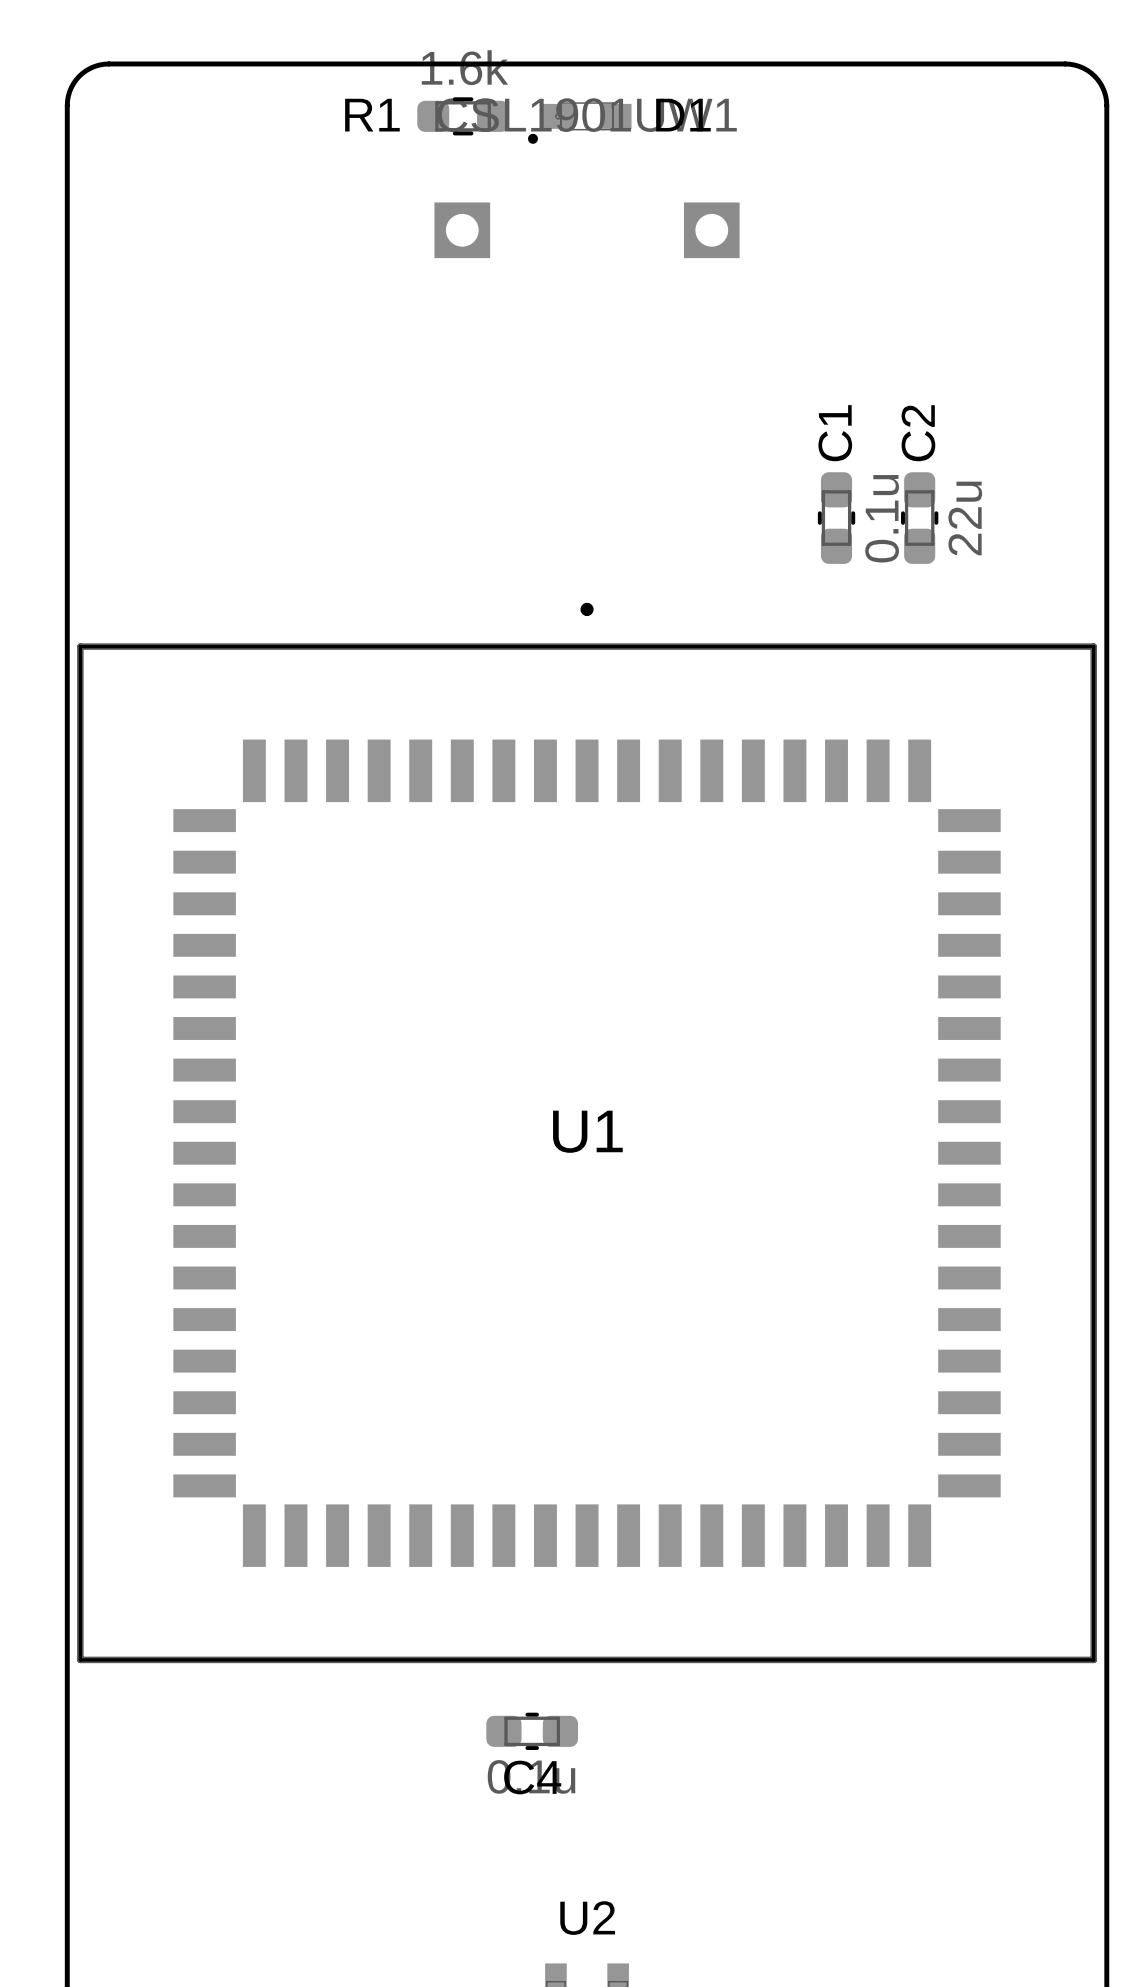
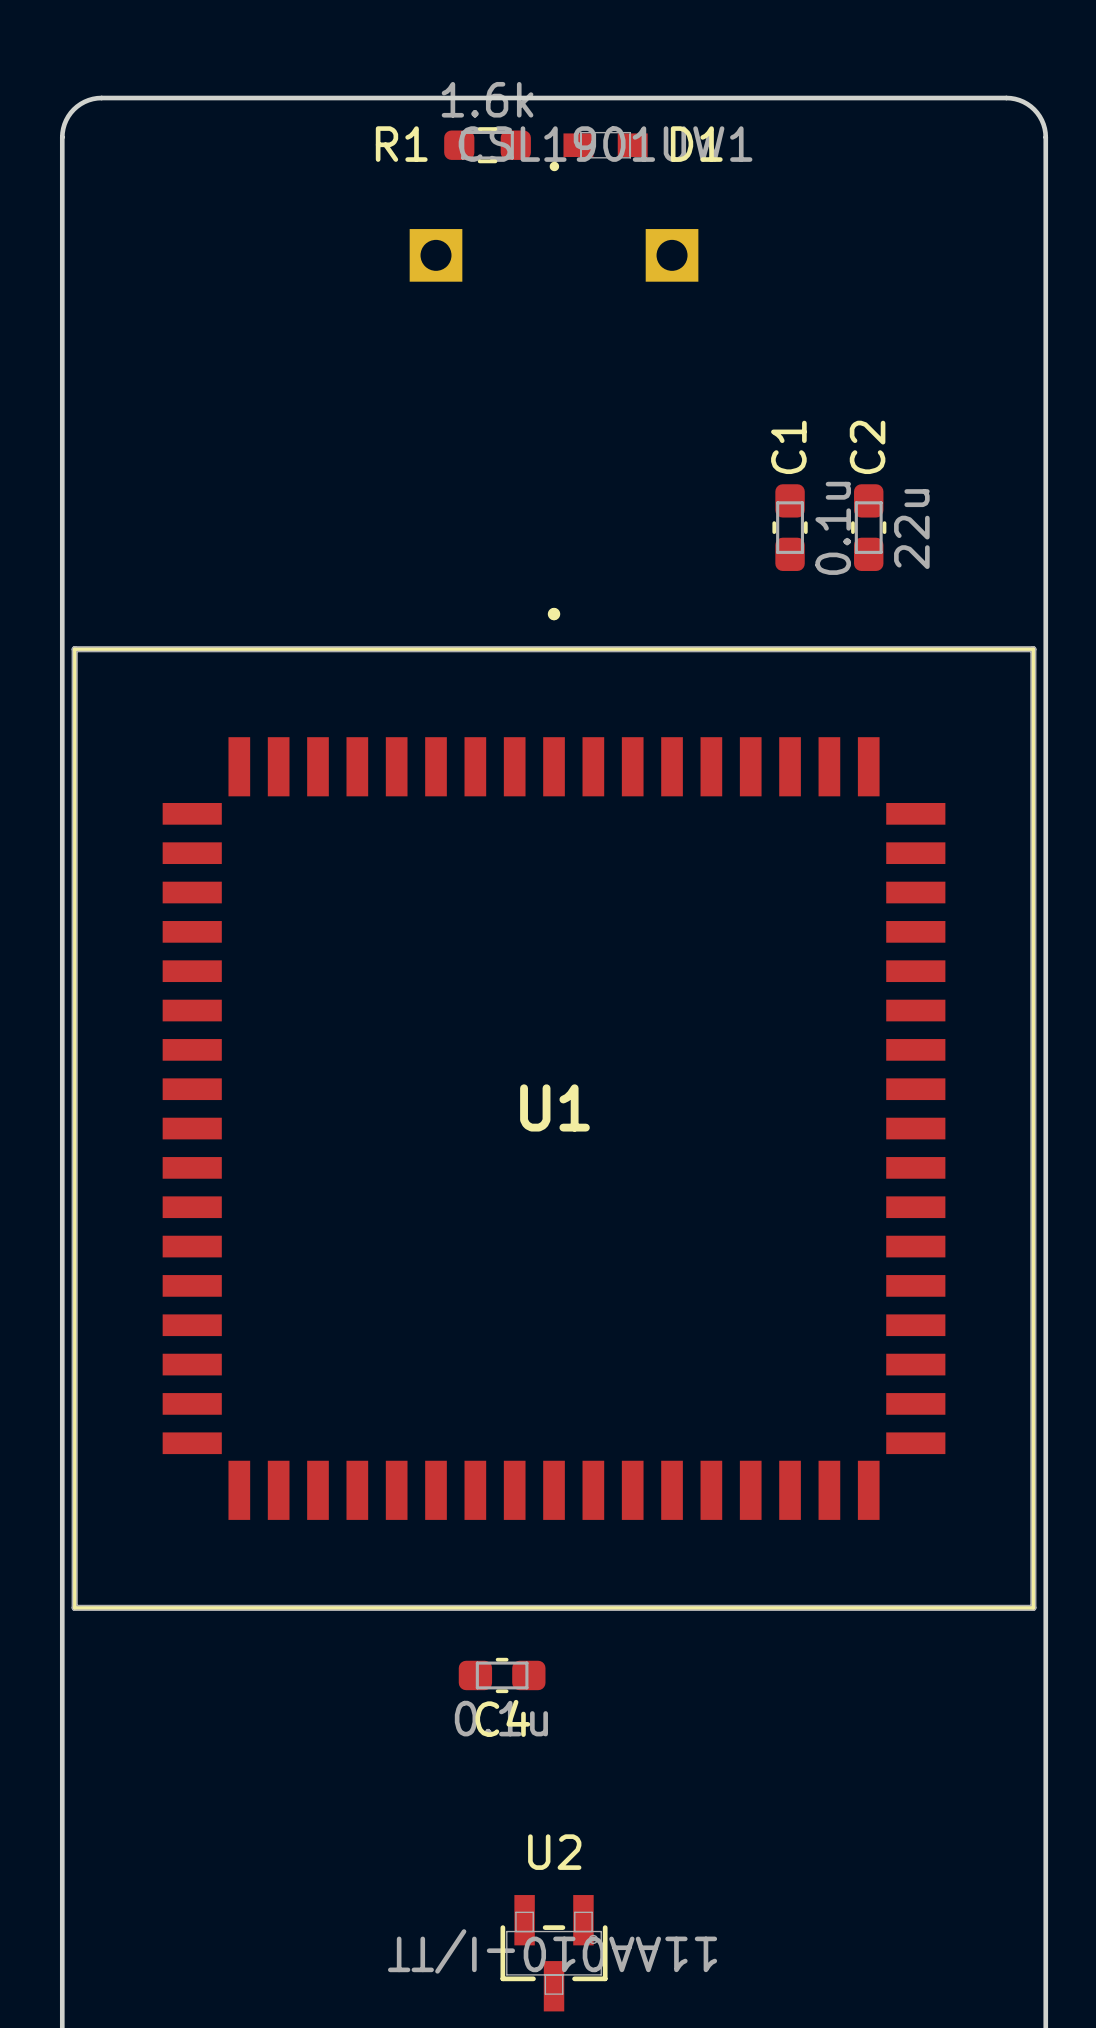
R1 position: (463, 116) -> (487, 145)
D1 position: (579, 123) -> (598, 151)

